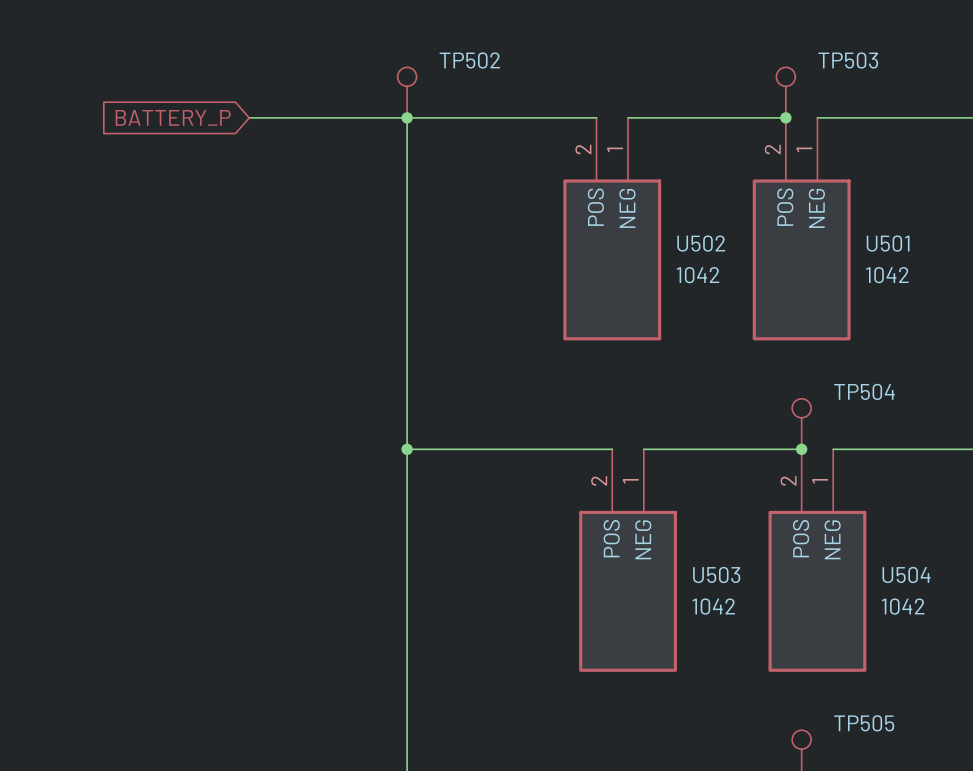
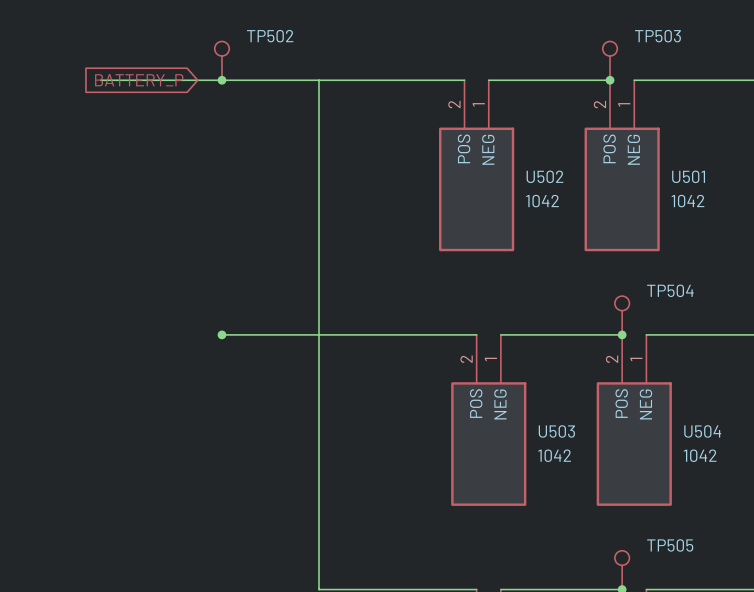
TP502 position: (407, 92) -> (221, 60)
wire: none -> (100, 80) (197, 80)
junction: none -> (221, 80)
junction: (407, 117) -> none
wire: none -> (221, 334) (318, 334)
junction: none -> (221, 334)
junction: (407, 449) -> none

